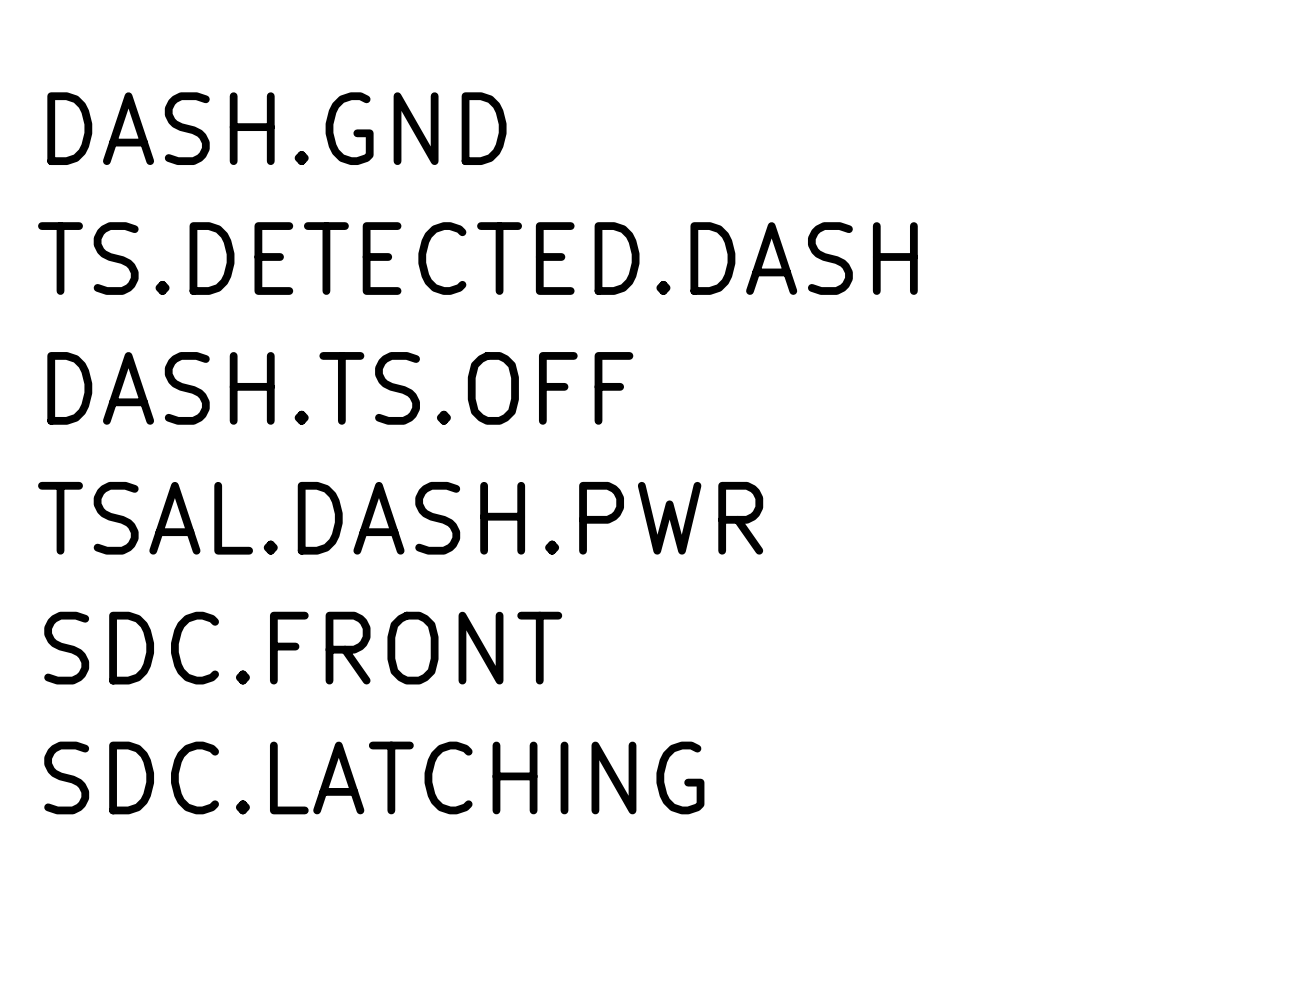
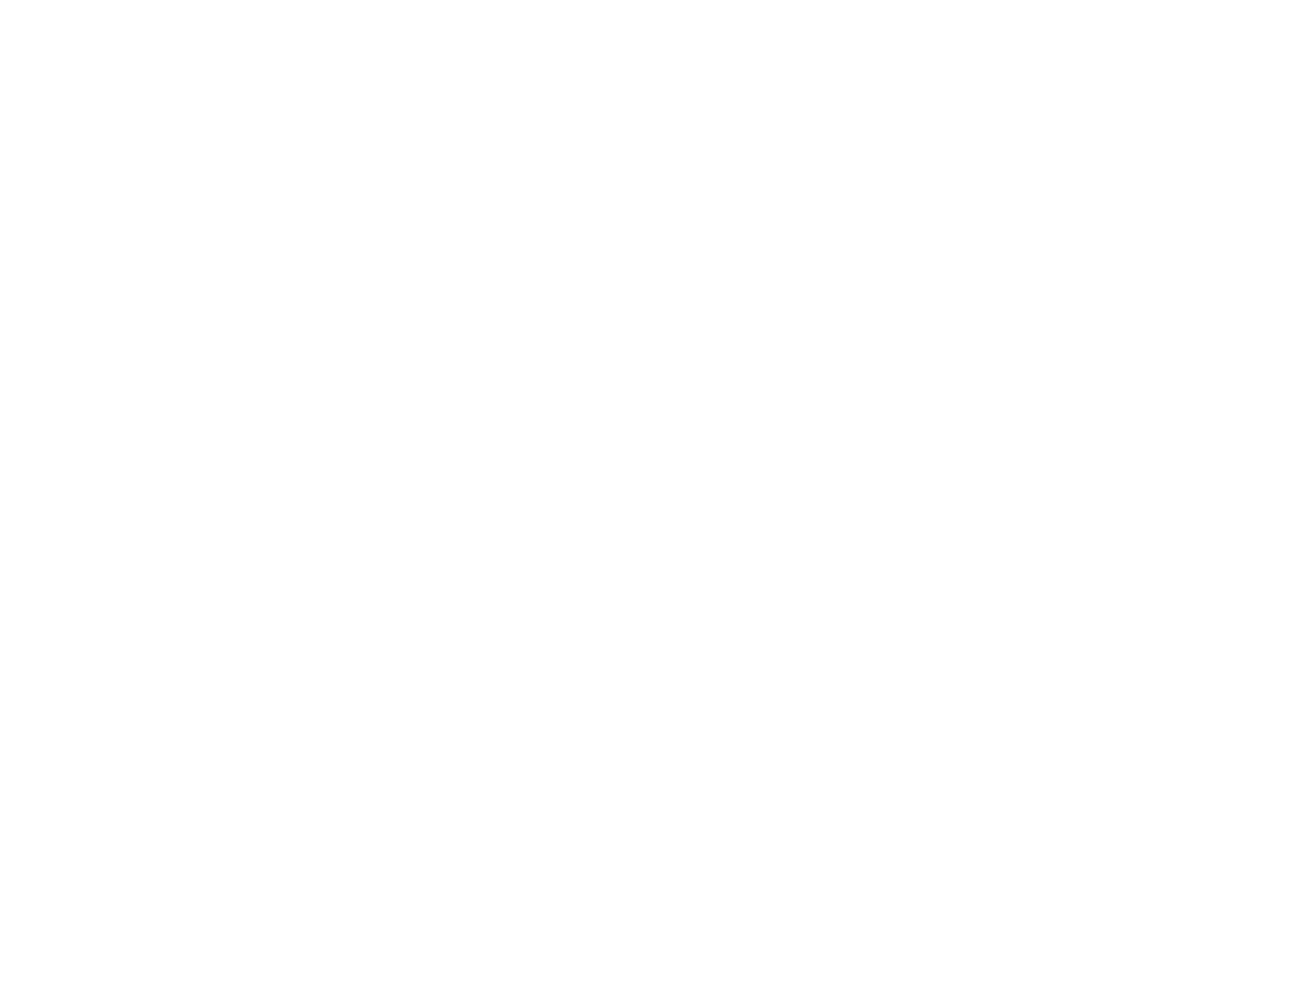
label: DASH.GND (276, 128) -> none
label: TS.DETECTED.DASH (477, 258) -> none
label: DASH.TS.OFF (340, 388) -> none
label: TSAL.DASH.PWR (400, 518) -> none
label: SDC.FRONT (303, 648) -> none
label: SDC.LATCHING (374, 777) -> none

